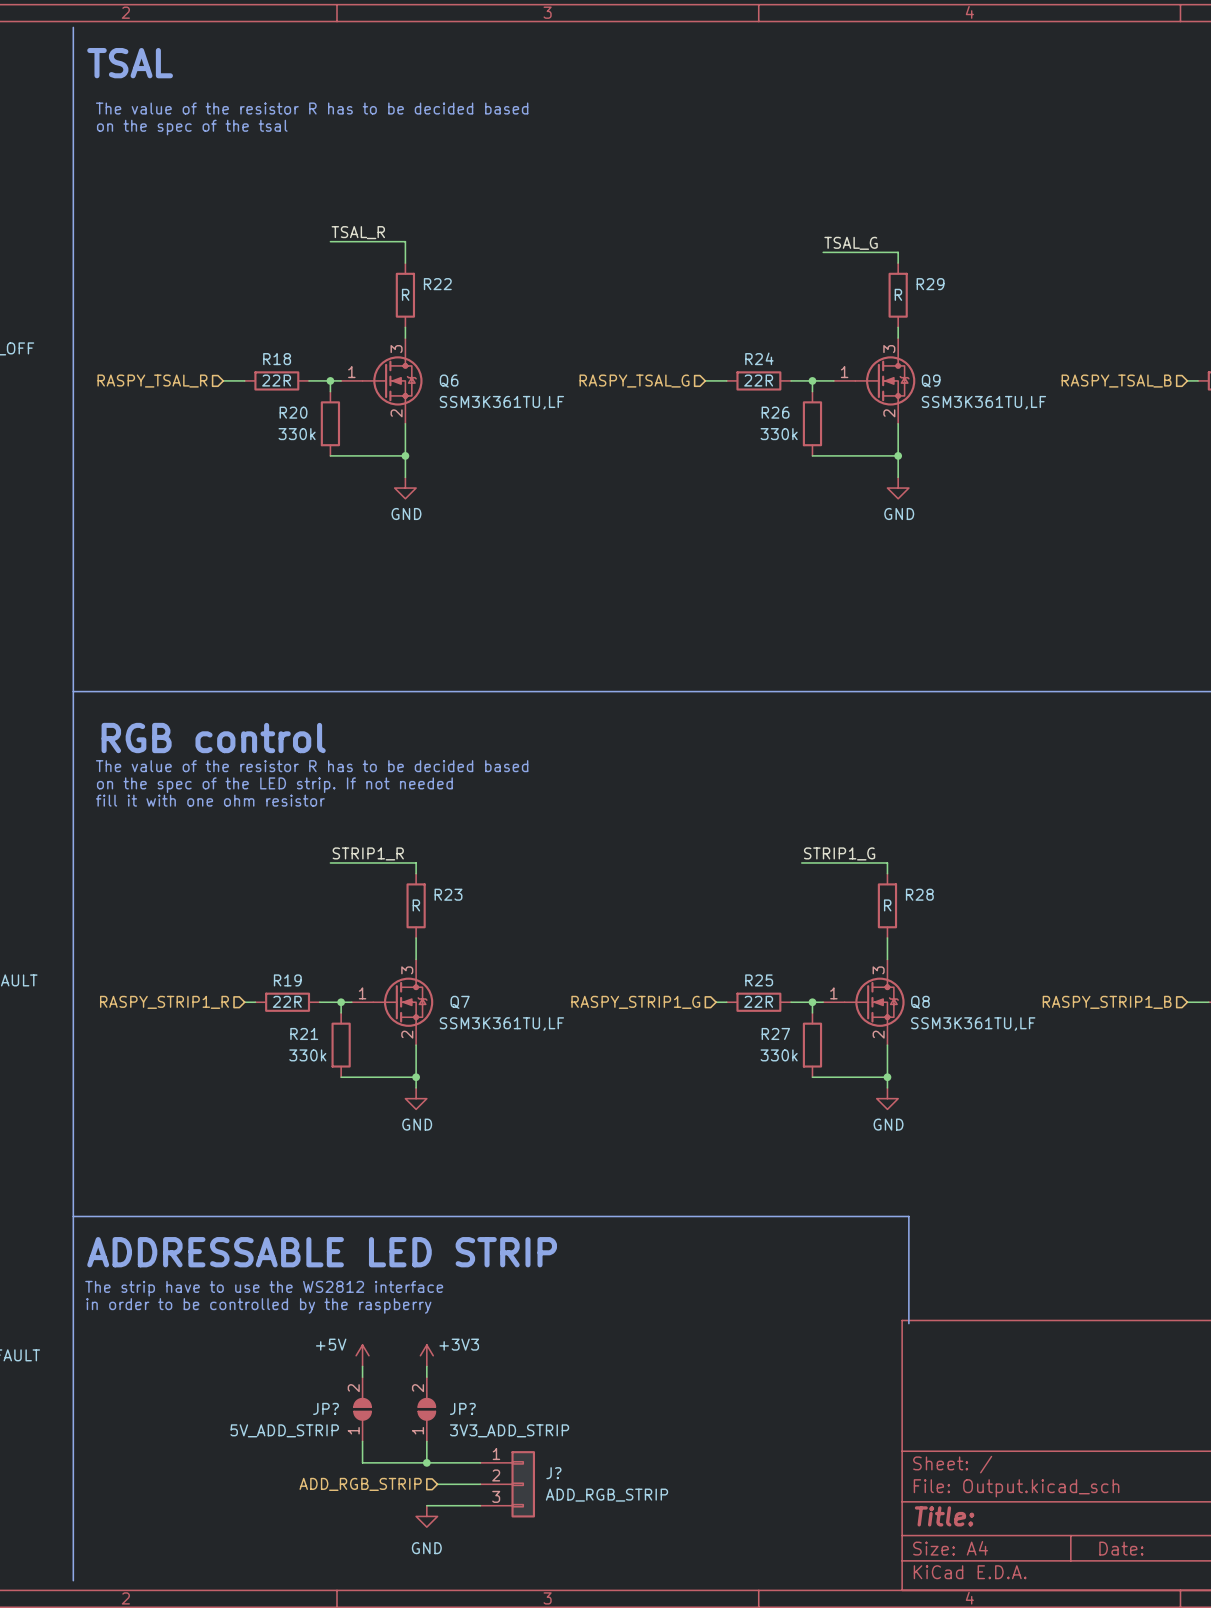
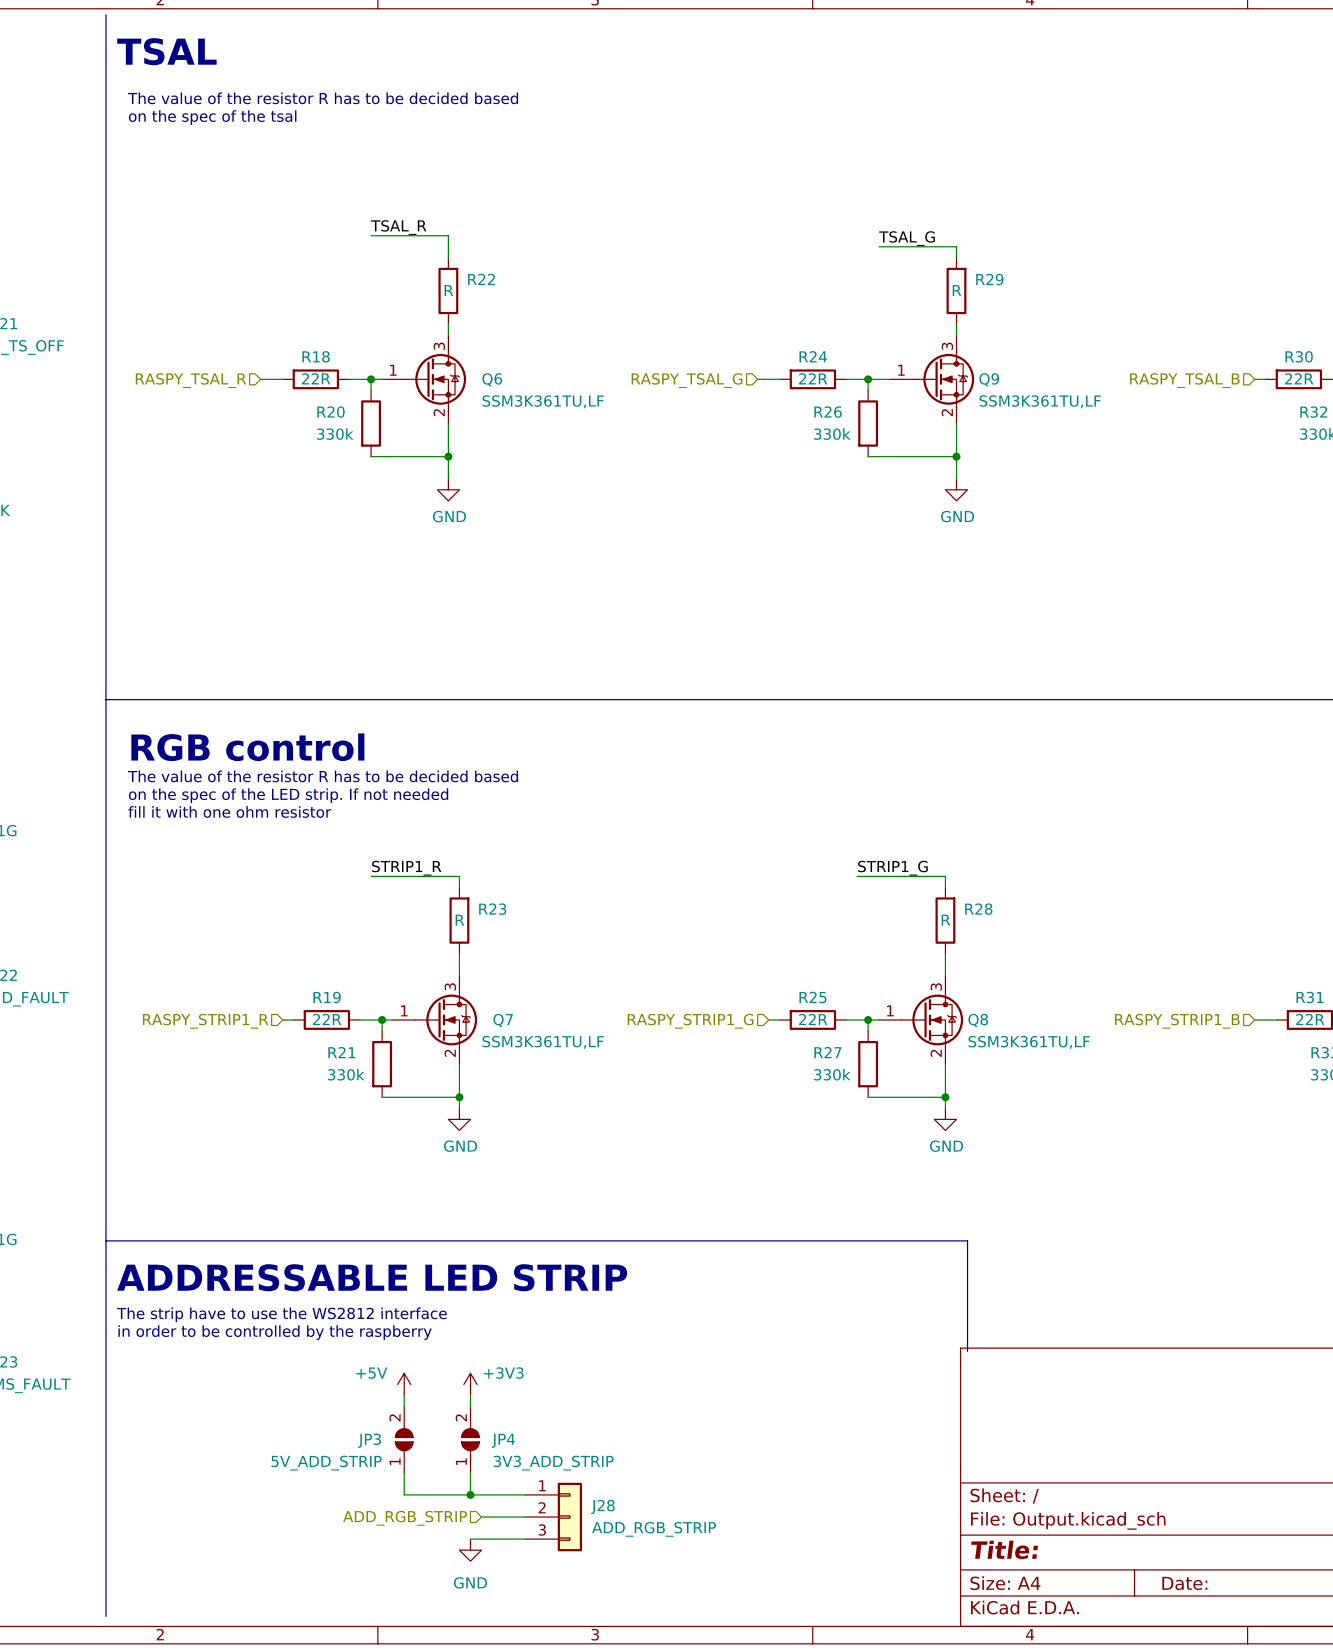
JP? name: JP? (326, 1408) -> JP3 (369, 1440)
JP? name: JP? (462, 1408) -> JP4 (503, 1440)
J? name: J? (553, 1473) -> J28 (602, 1506)

